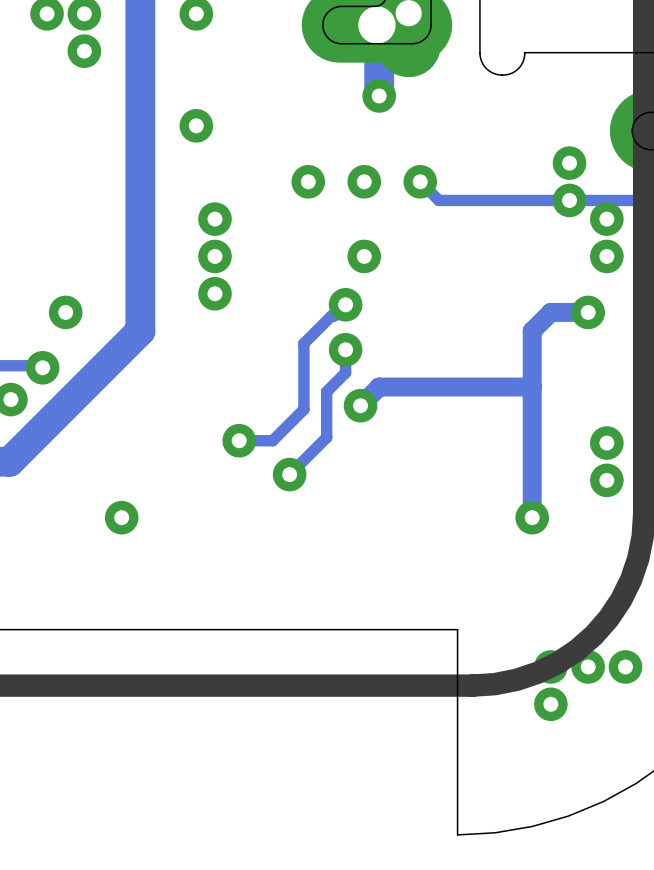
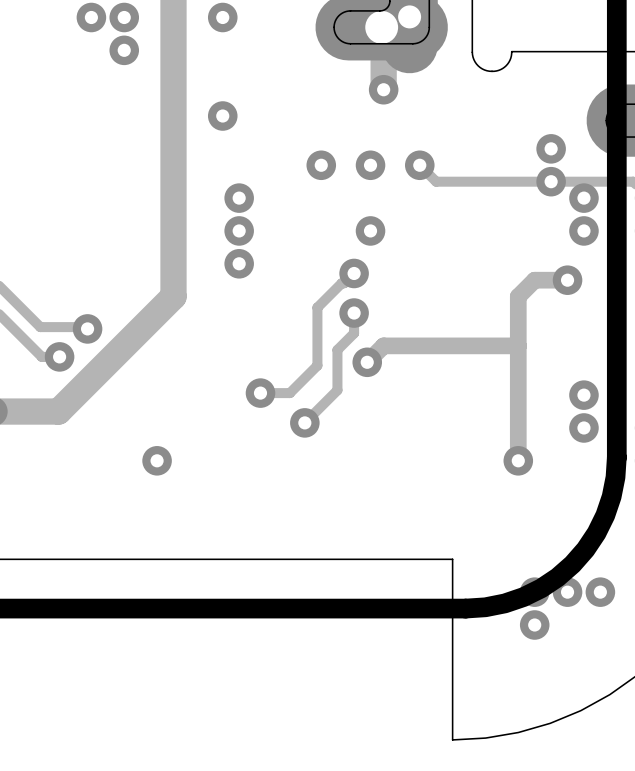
via: (65, 312) -> none

